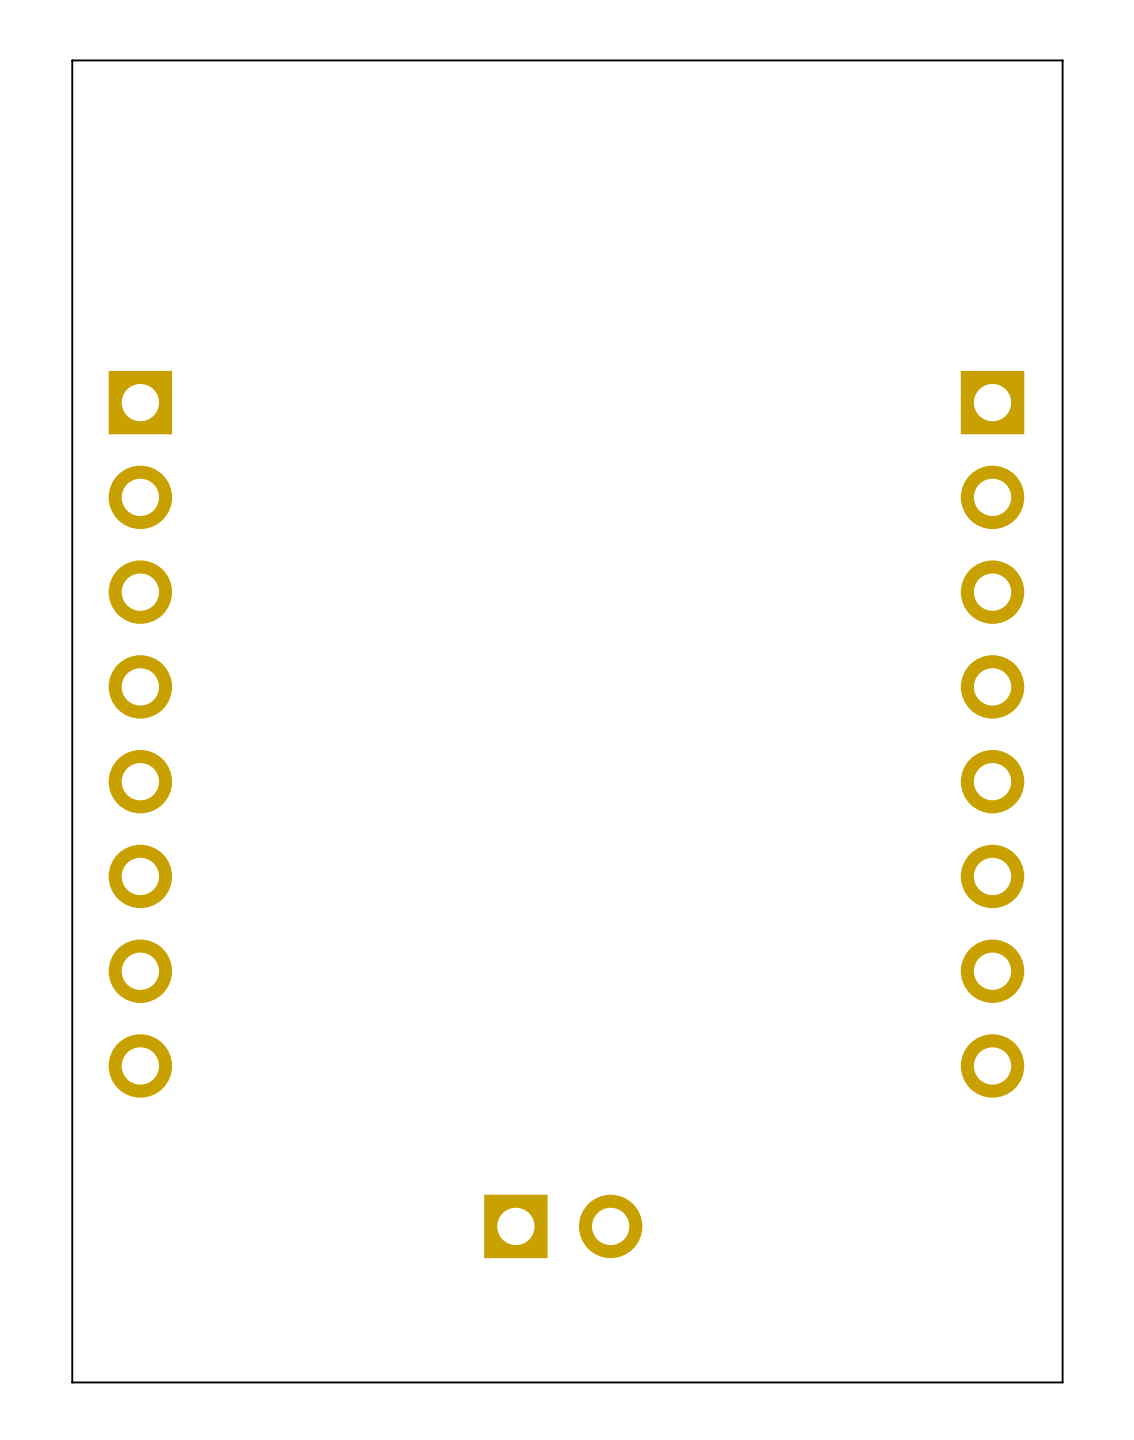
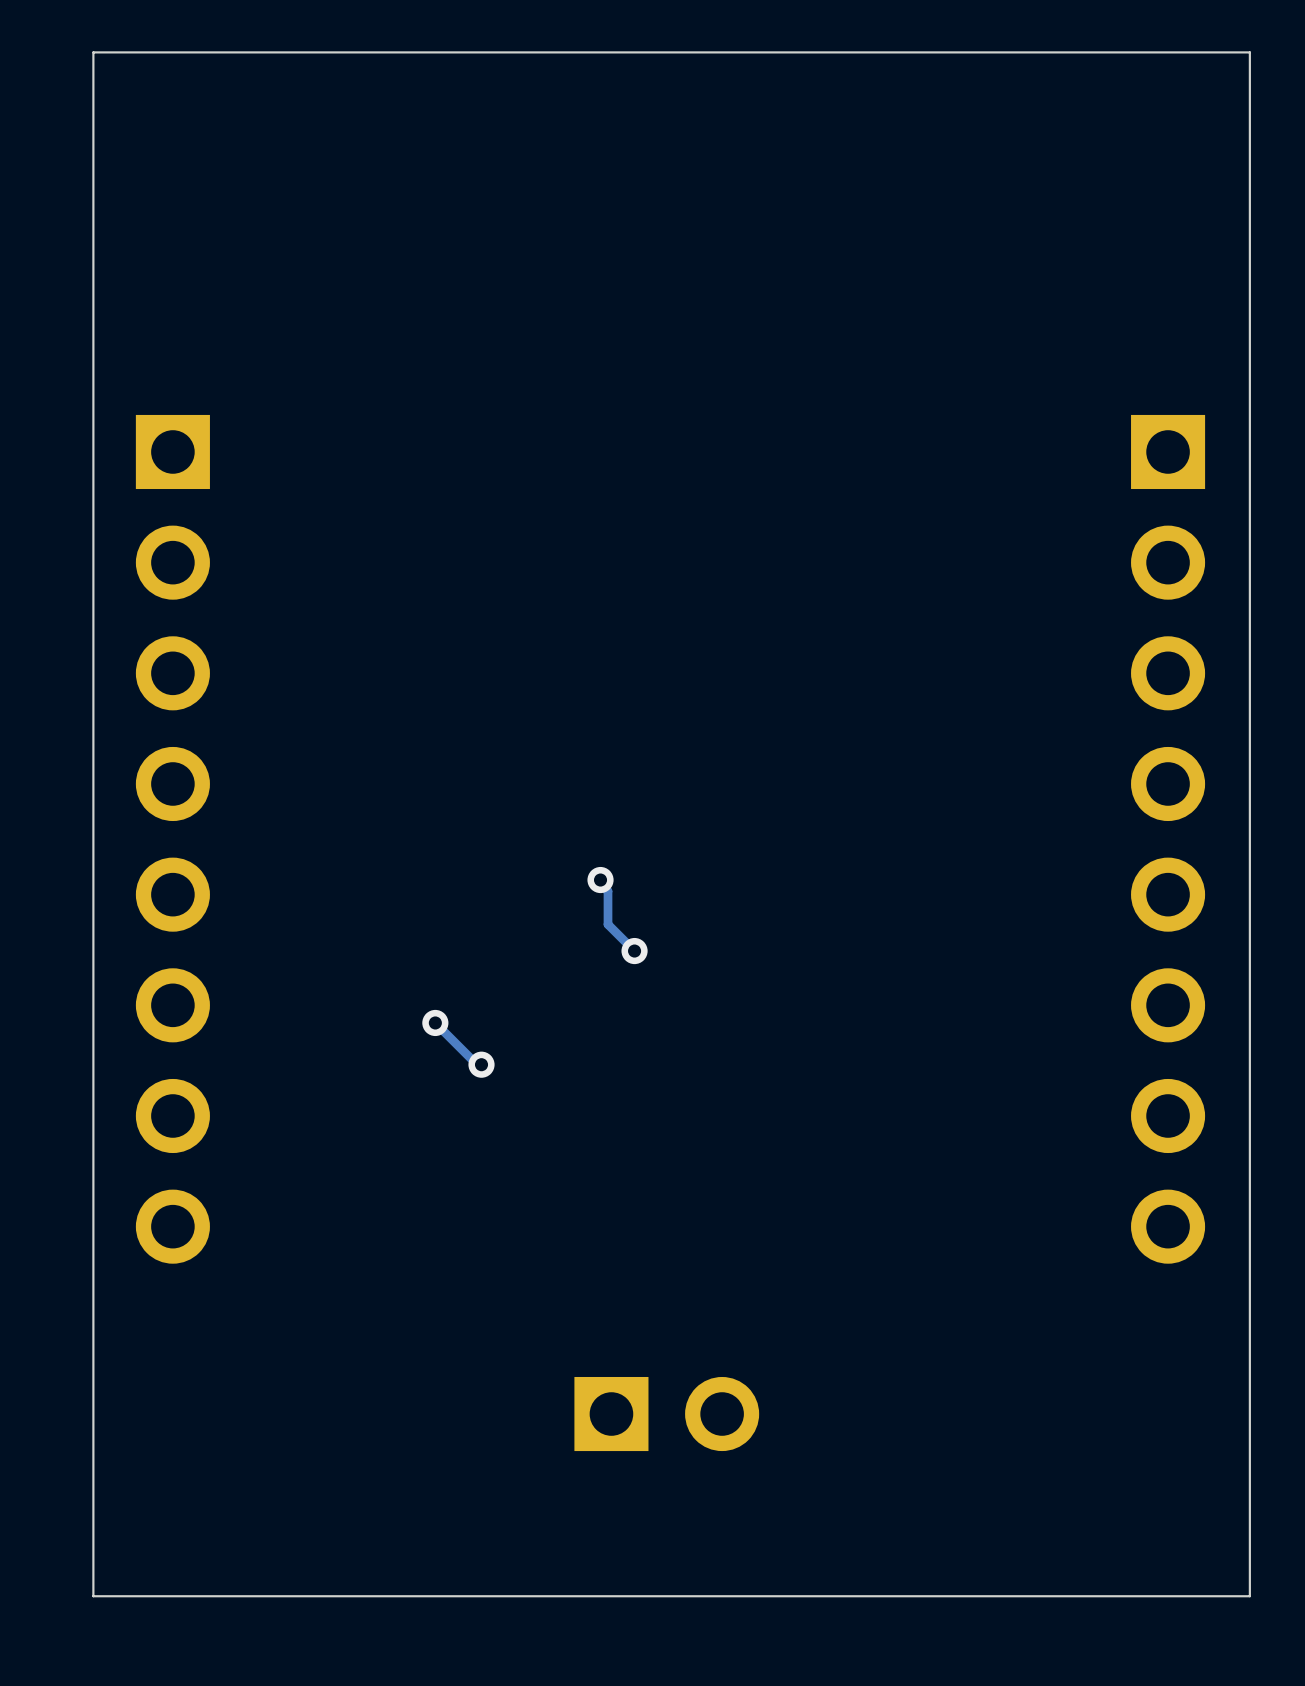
track: none -> (600, 880) (600, 883) (608, 891) (608, 924) (634, 951)
via: none -> (600, 880)
via: none -> (634, 951)
track: none -> (435, 1022) (477, 1064) (481, 1064)
via: none -> (435, 1022)
via: none -> (481, 1064)

